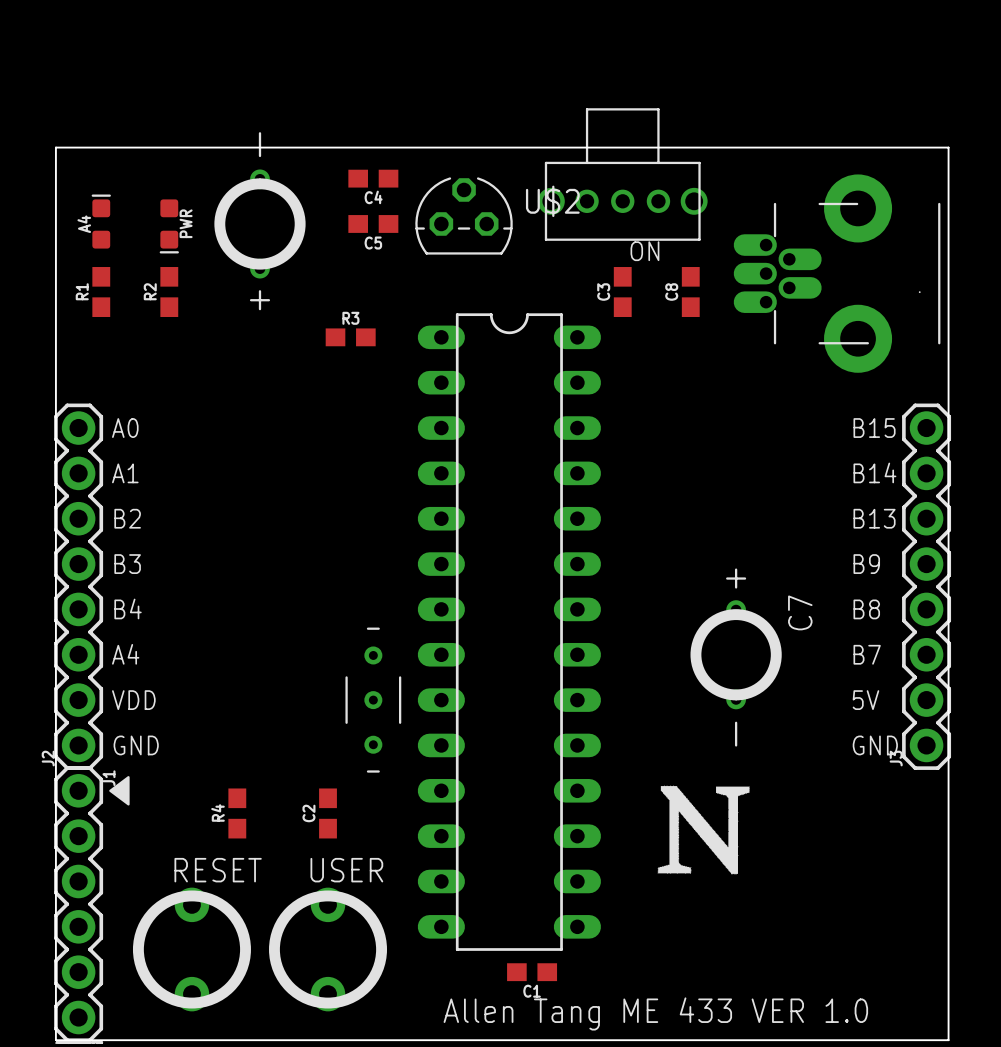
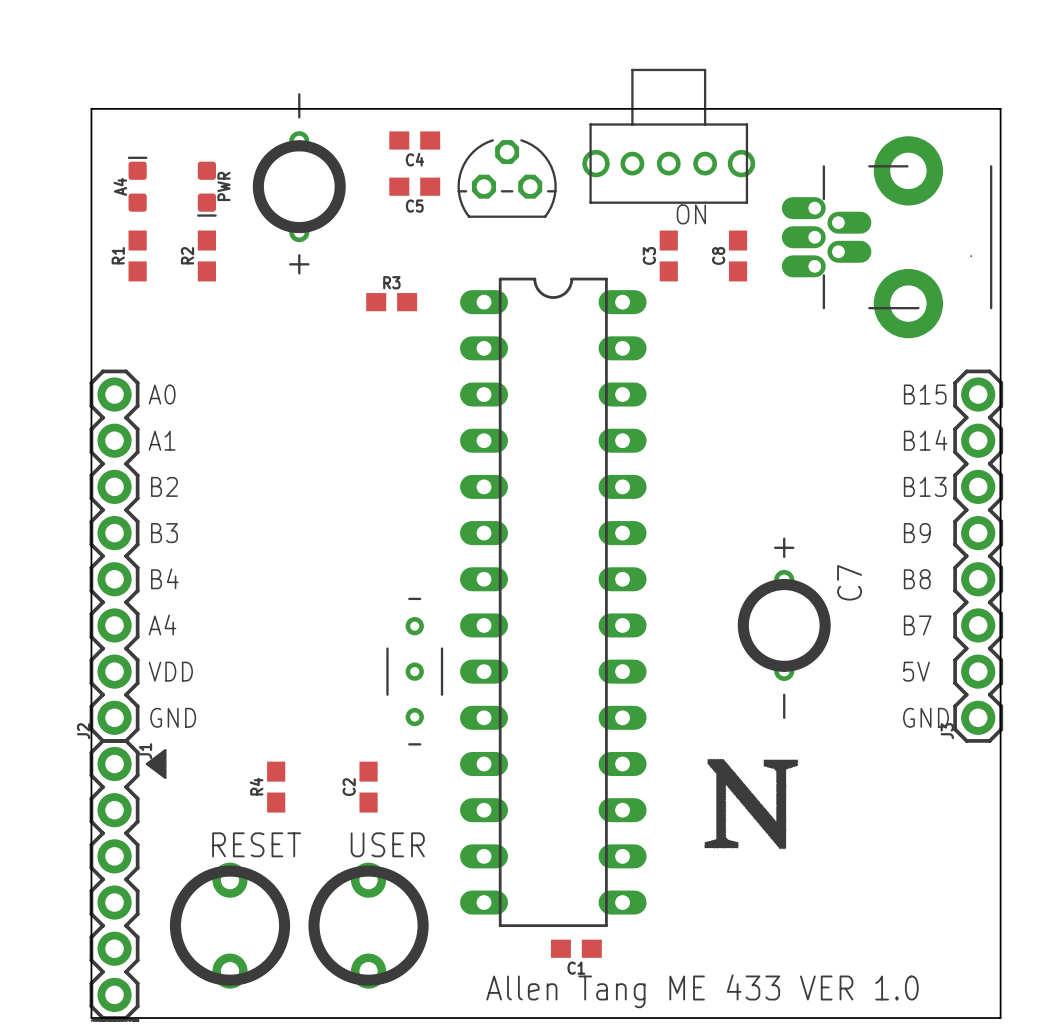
U$2 name: U$2 (552, 201) -> none

